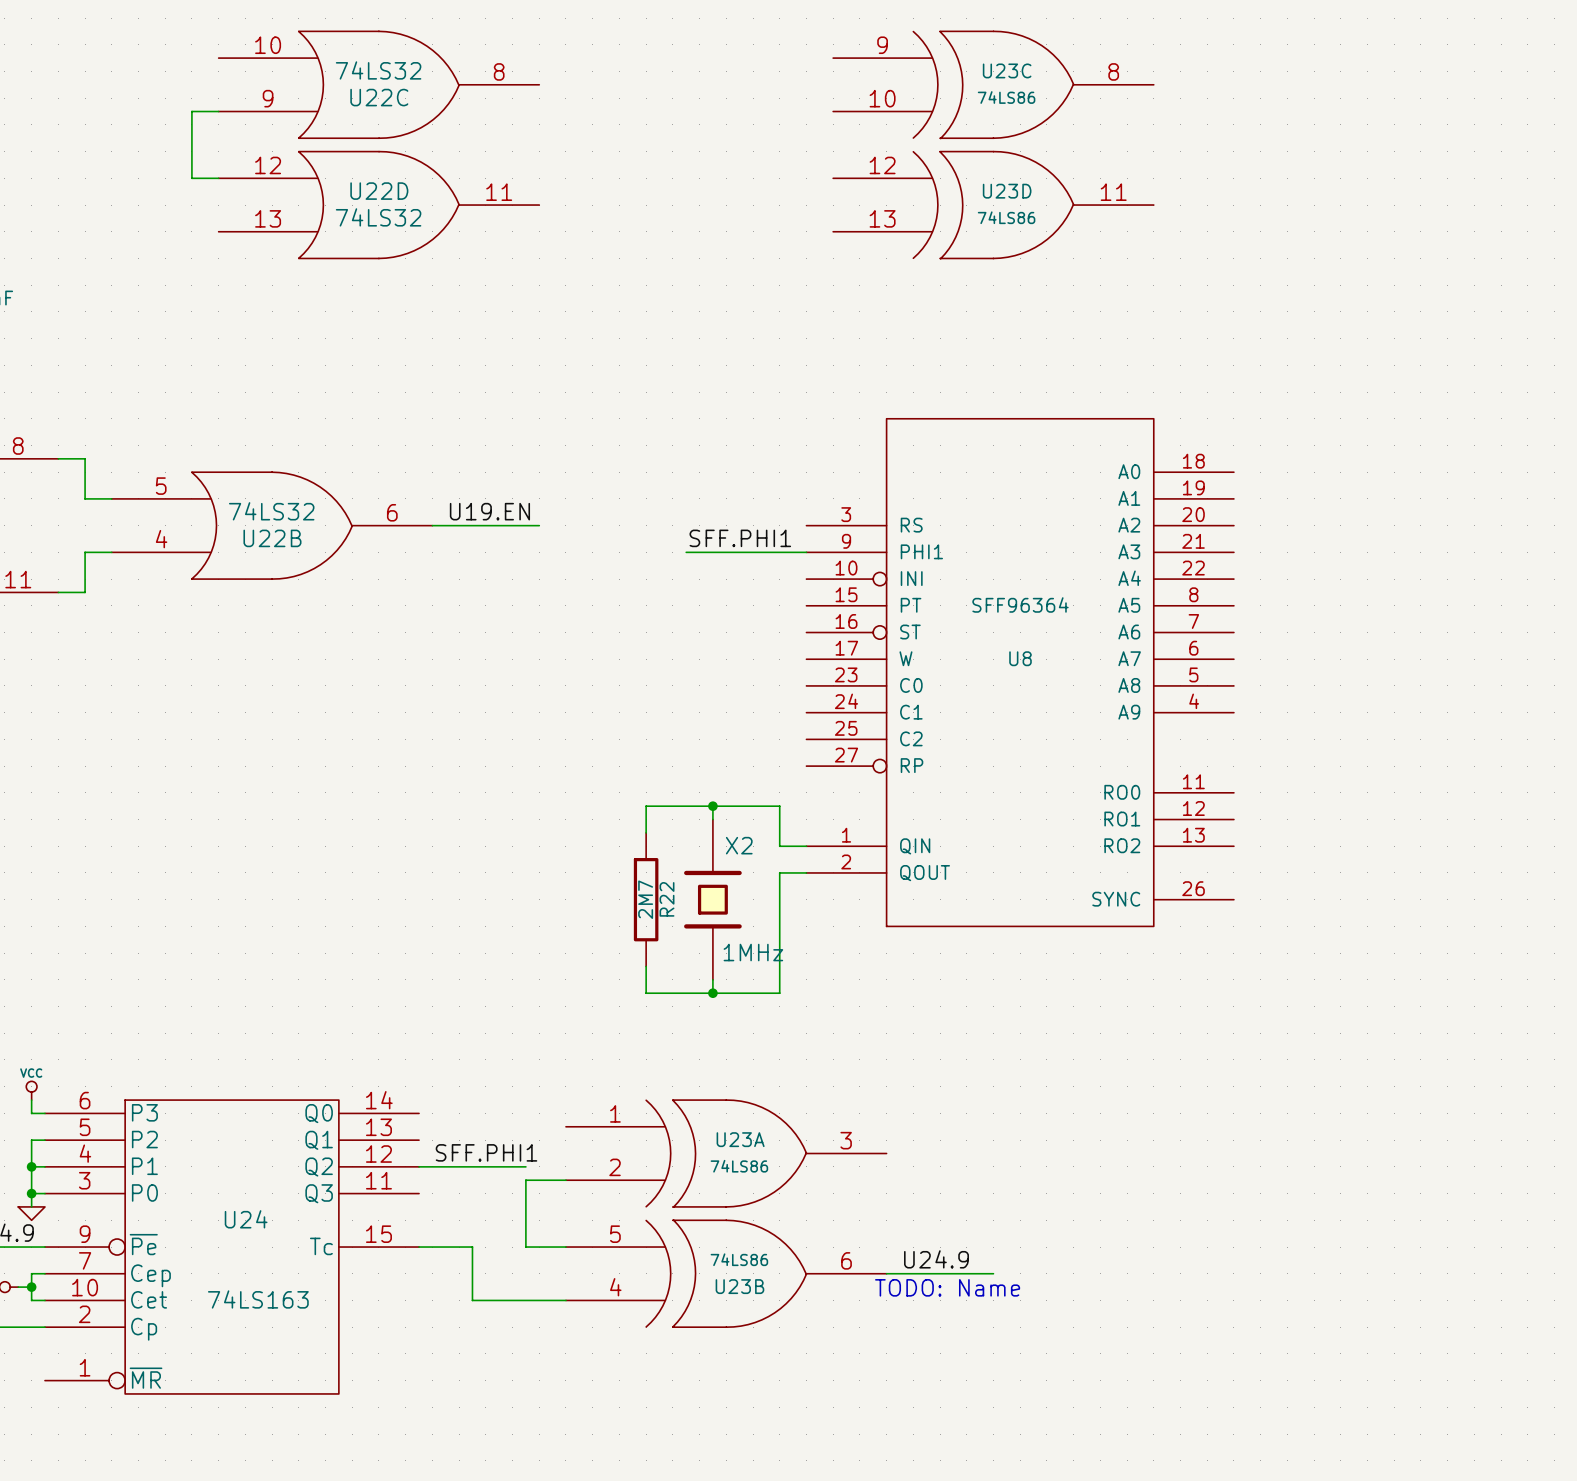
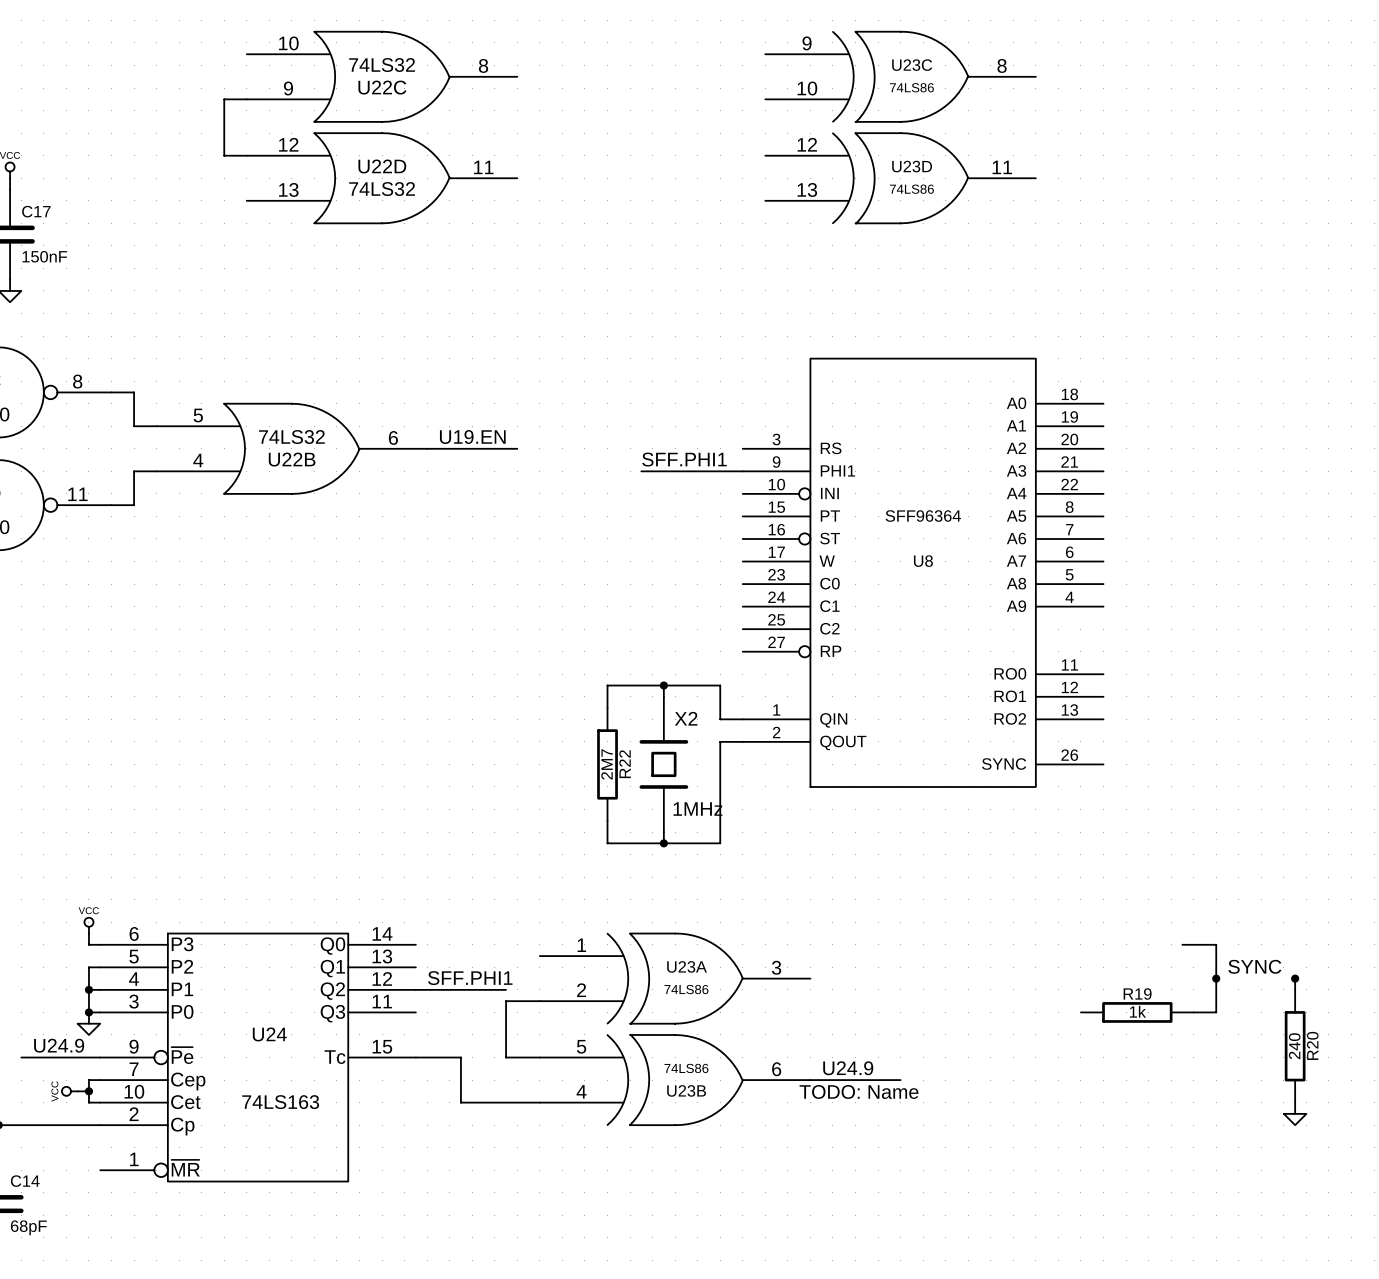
wire: none -> (1182, 944) (1216, 944) (1216, 1012) (1193, 1012)
label: none -> SYNC (1254, 966)
junction: none -> (1216, 978)
wire: none -> (1295, 978) (1295, 989)
junction: none -> (1295, 978)
R19: none -> 1k (1137, 1012)
R20: none -> 240 (1295, 1046)
wire: none -> (1295, 1102) (1295, 1113)
power symbol: none -> (1295, 1119)

